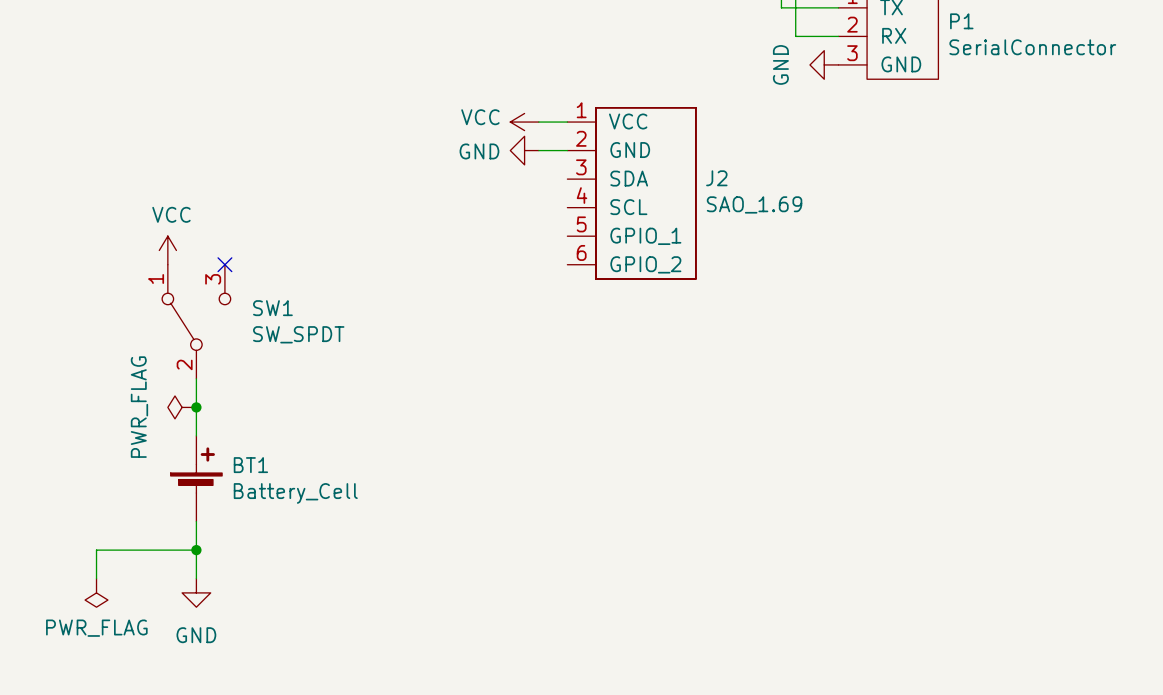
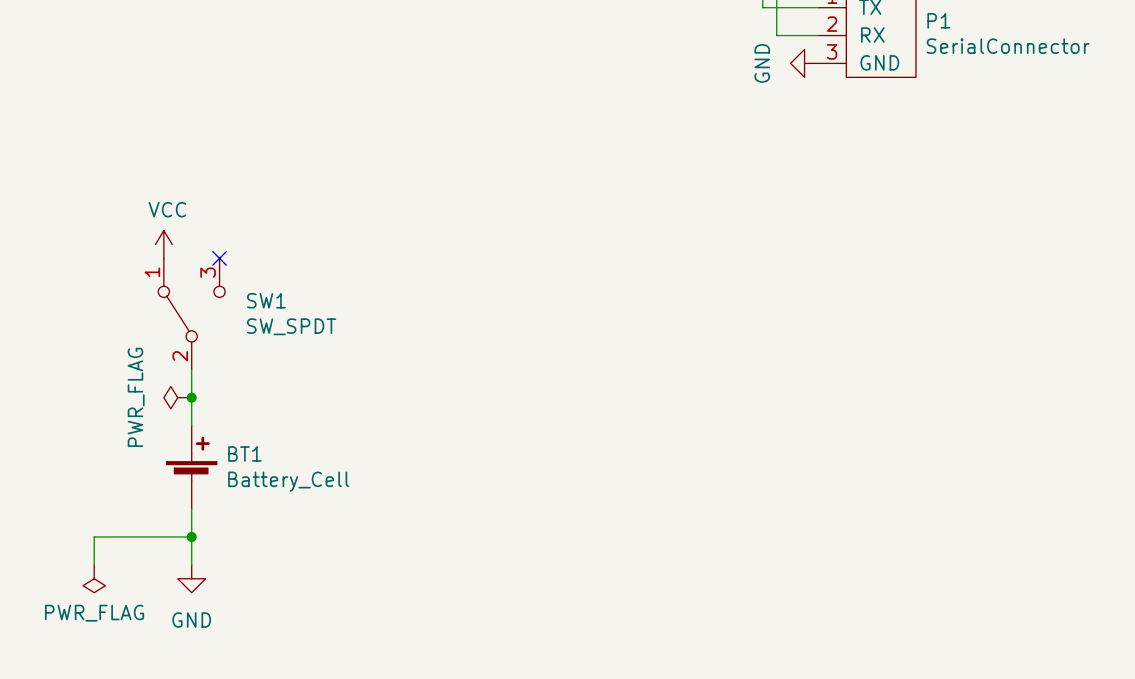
power symbol: VCC (524, 122) -> none
wire: (538, 122) (567, 122) -> none
power symbol: GND (524, 150) -> none
wire: (538, 150) (567, 150) -> none
J2: SAO_1.69 (631, 193) -> none

